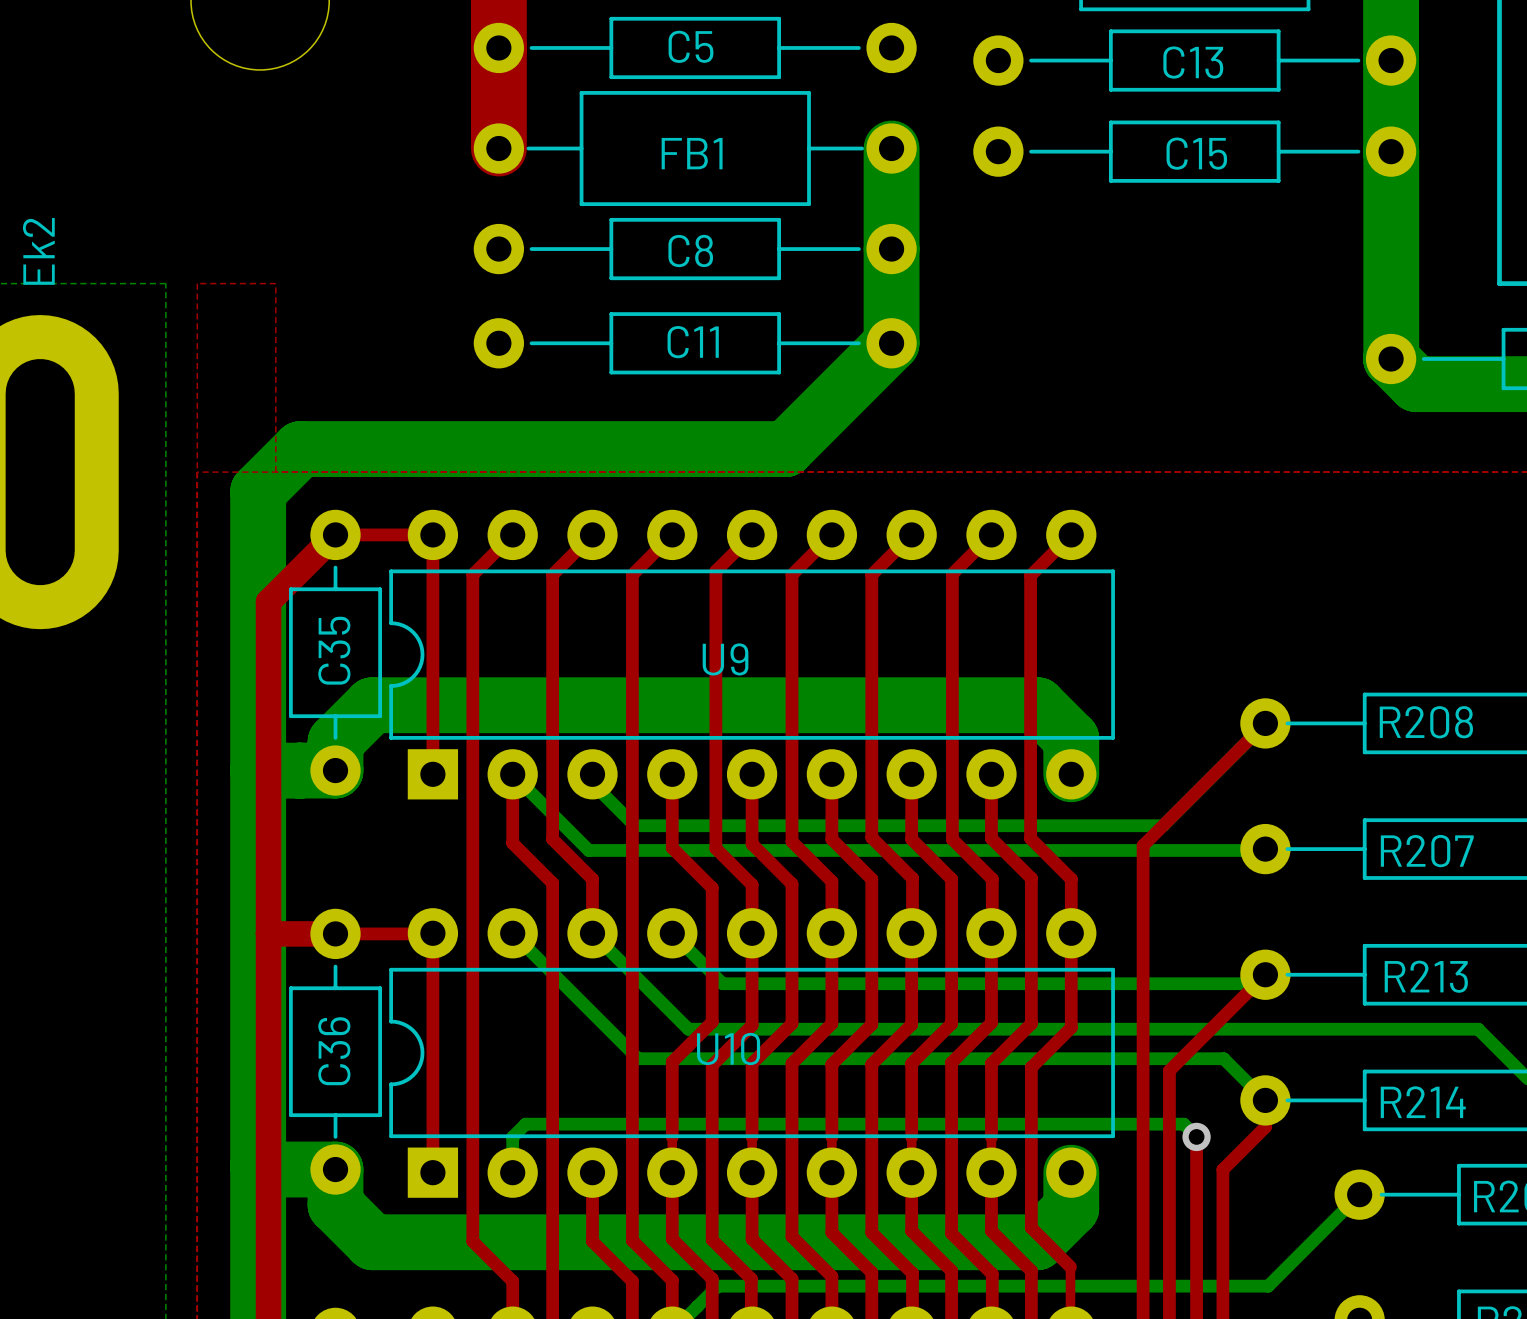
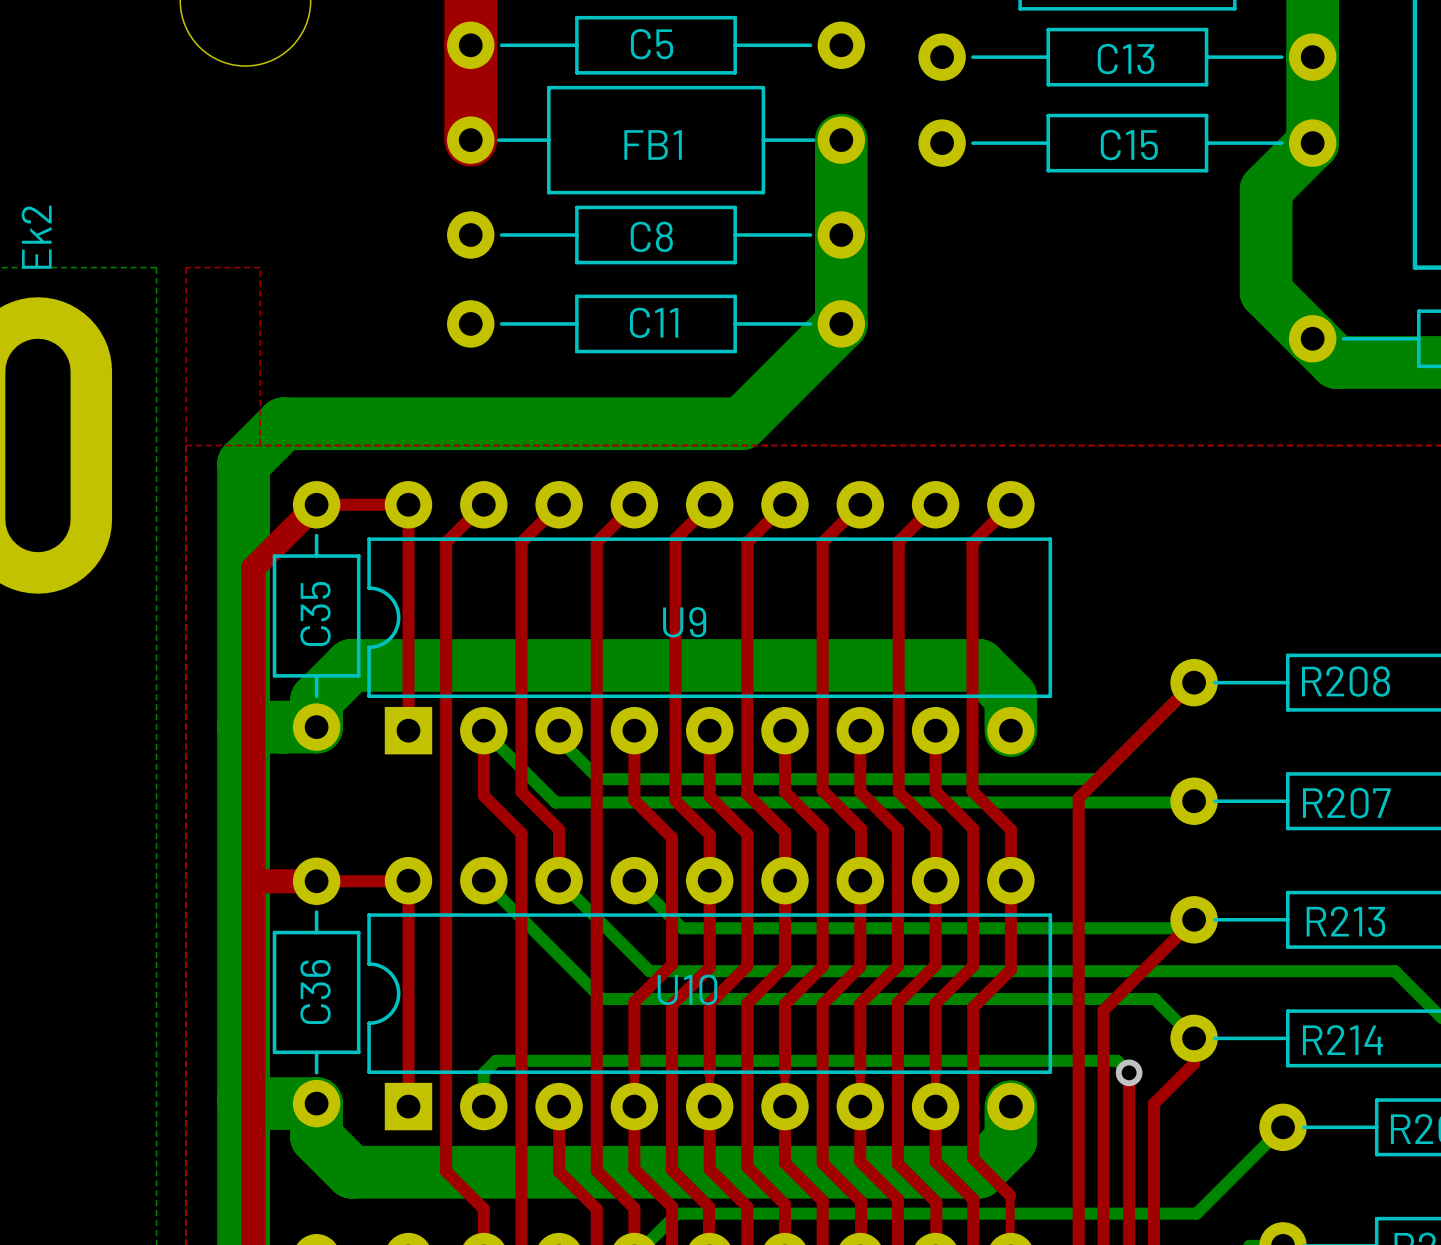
bottom track: (1391, 151) (1391, 358) -> (1312, 143) (1266, 189) (1266, 292) (1312, 338)

